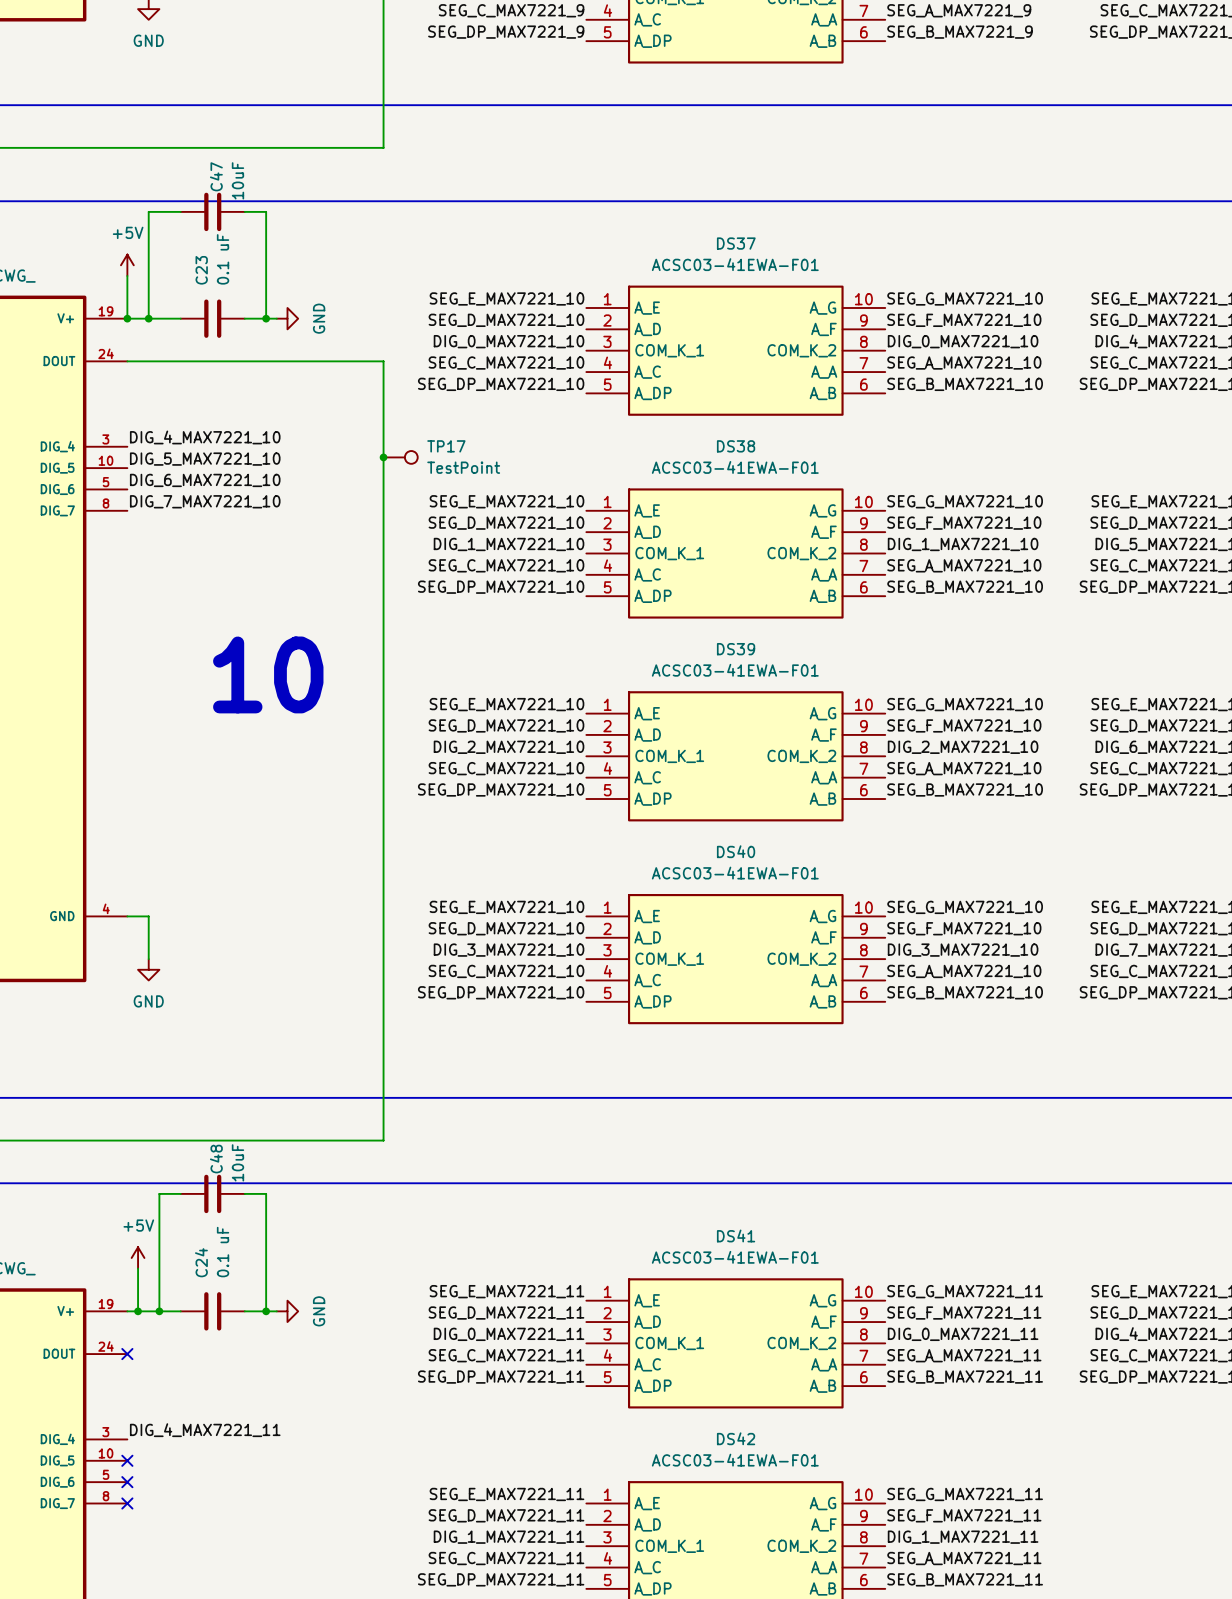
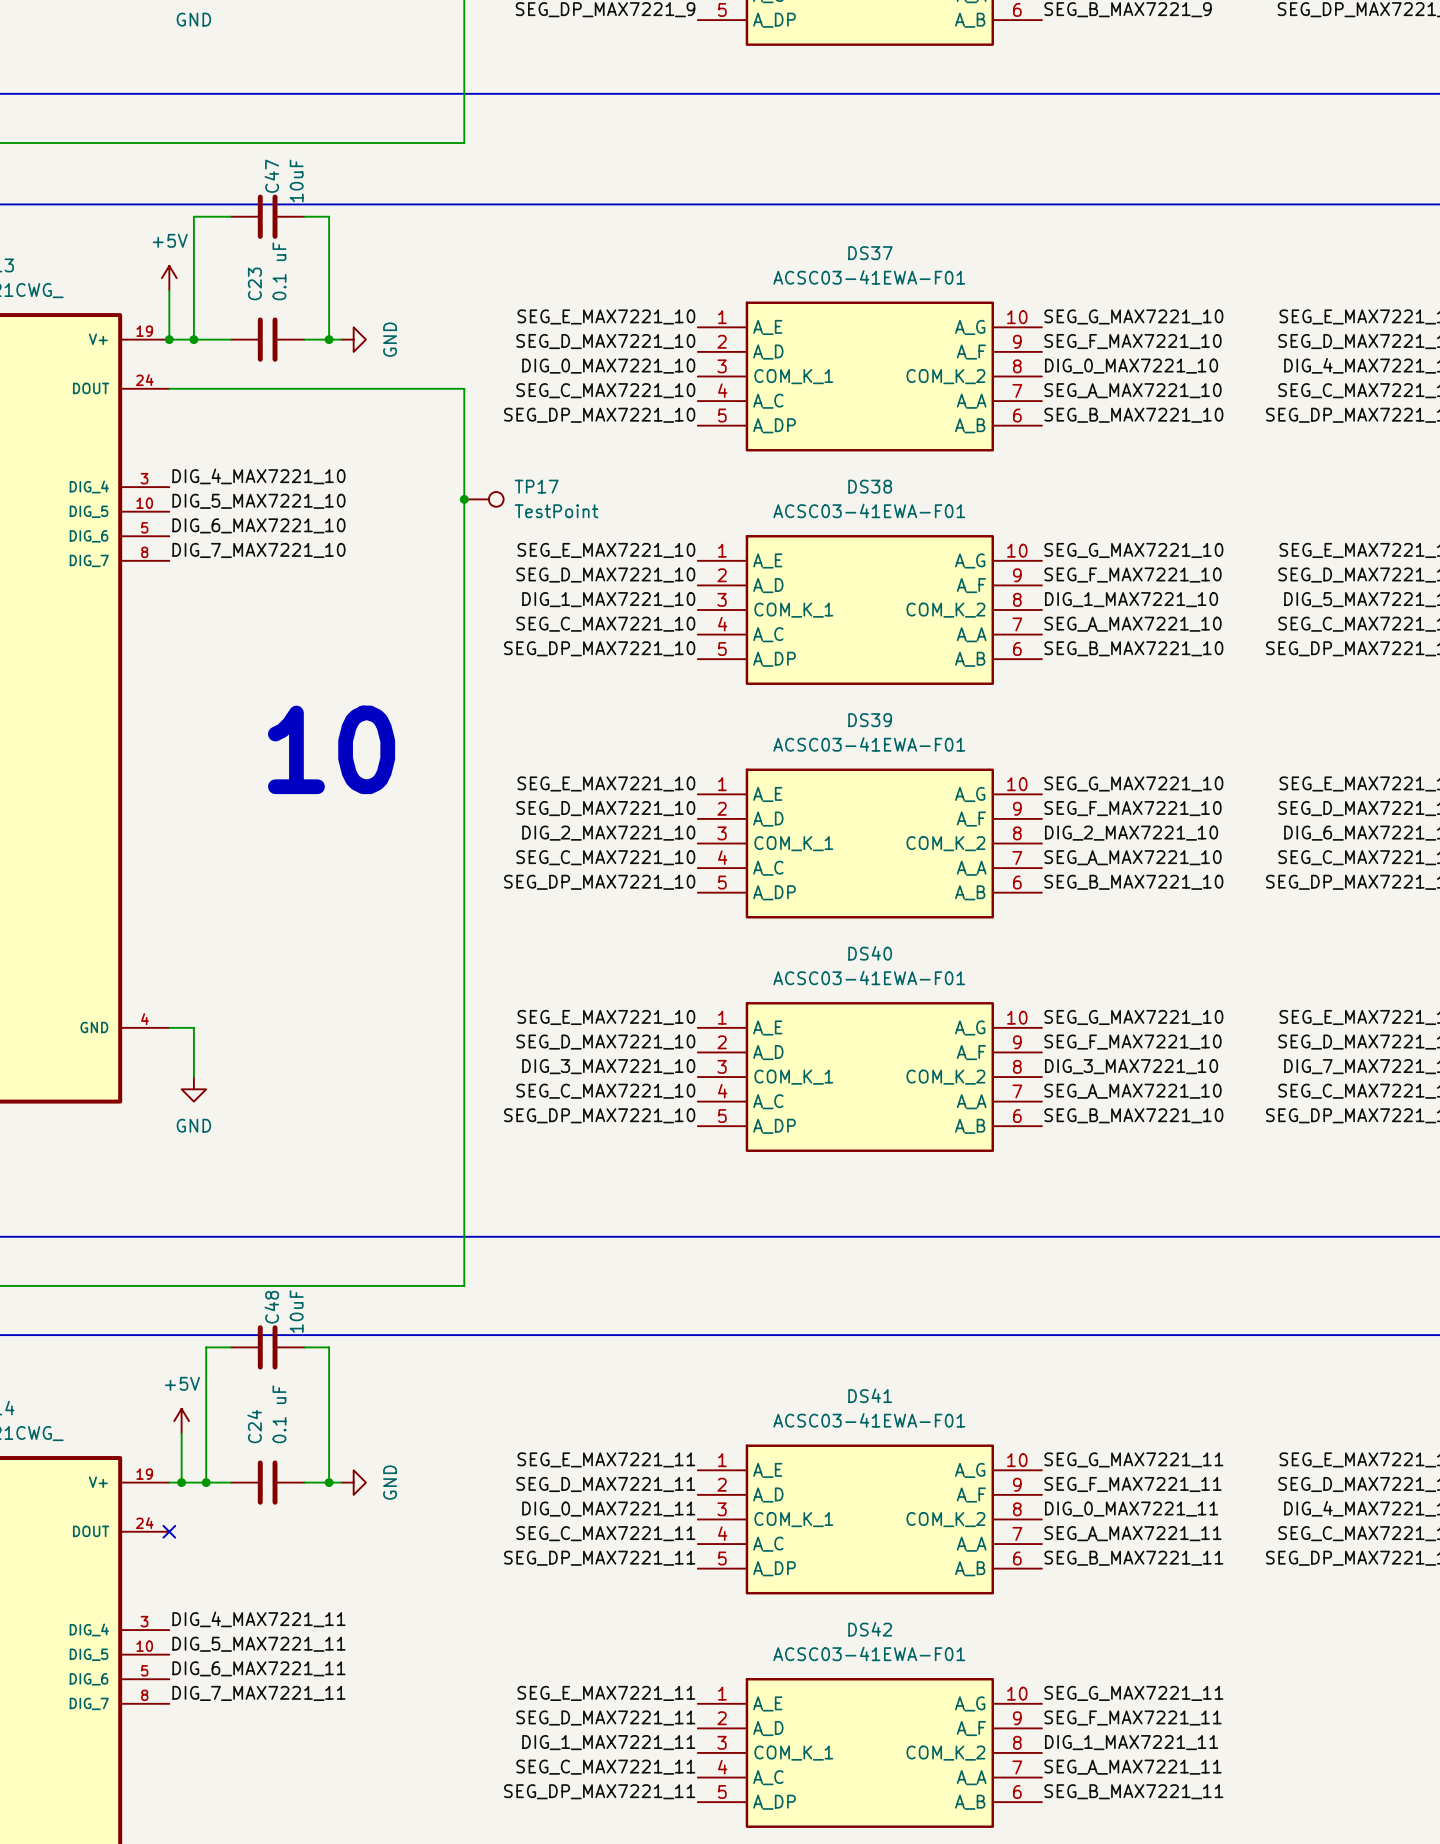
label: none -> DIG_5_MAX7221_11 (258, 1644)
no-connect mark: (127, 1460) -> none
label: none -> DIG_6_MAX7221_11 (258, 1668)
no-connect mark: (127, 1482) -> none
label: none -> DIG_7_MAX7221_11 (258, 1693)
no-connect mark: (127, 1503) -> none

